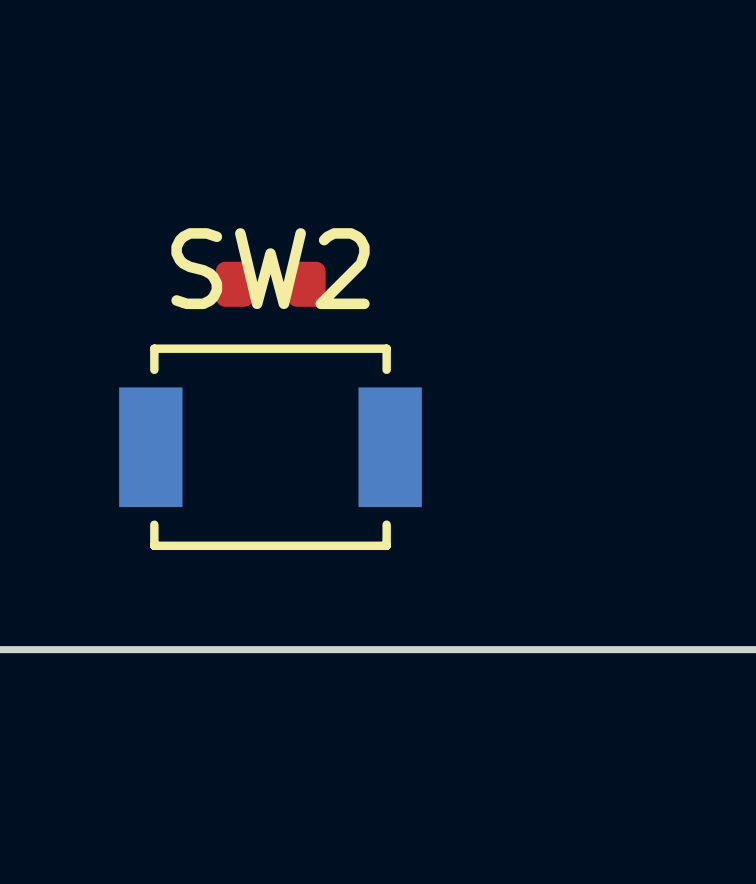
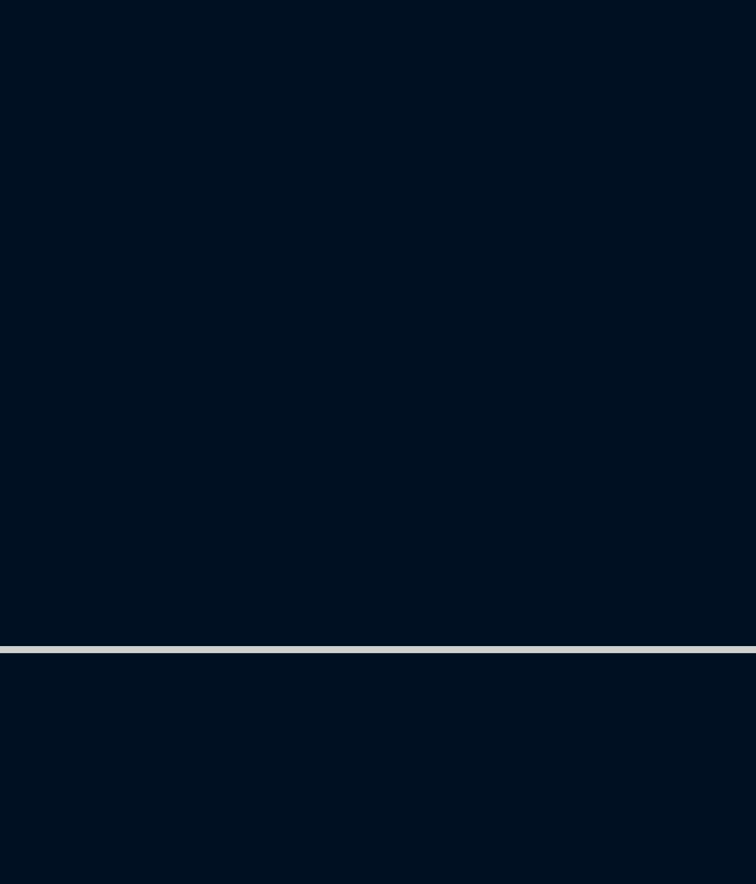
part: (270, 284) -> none
SW2: (270, 447) -> none

